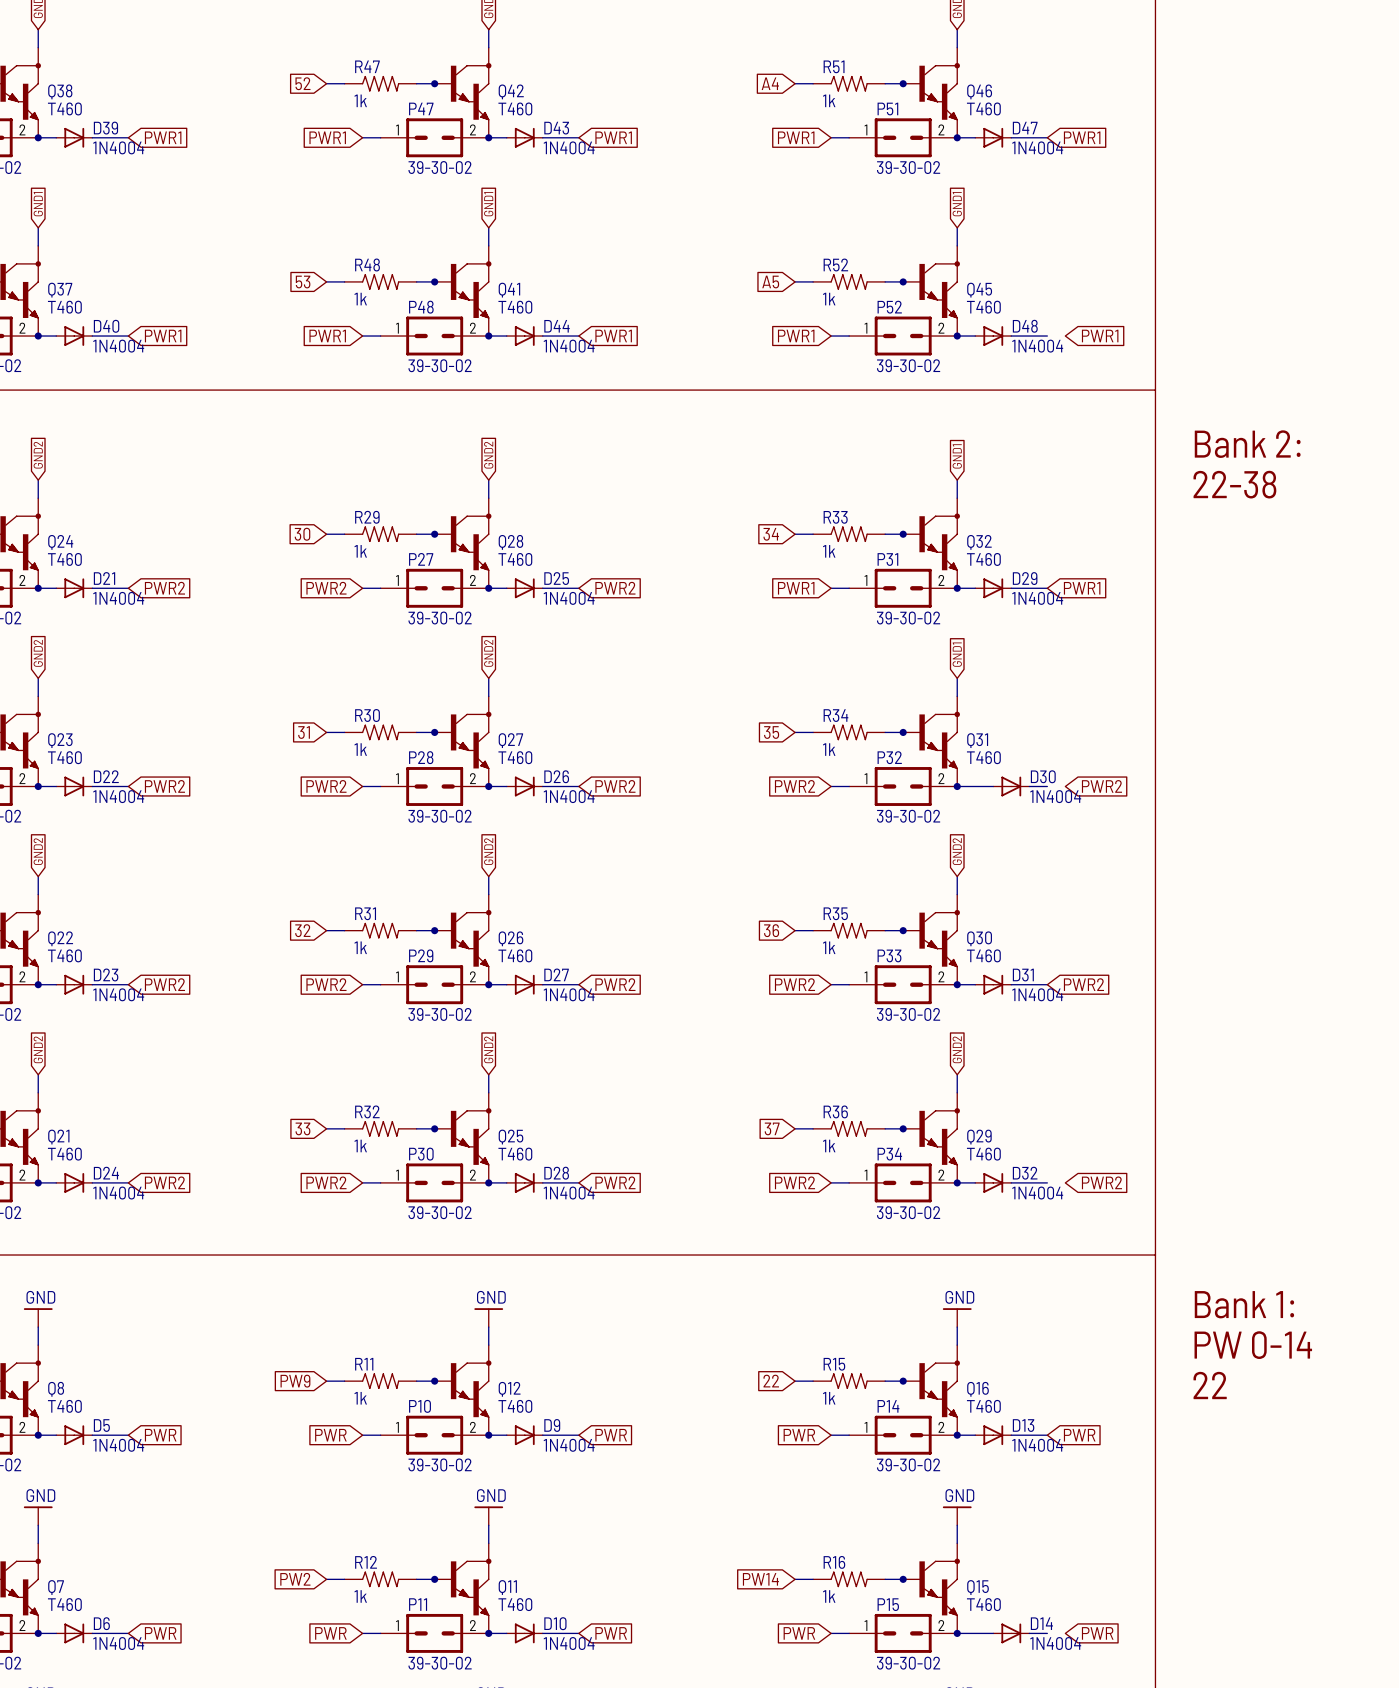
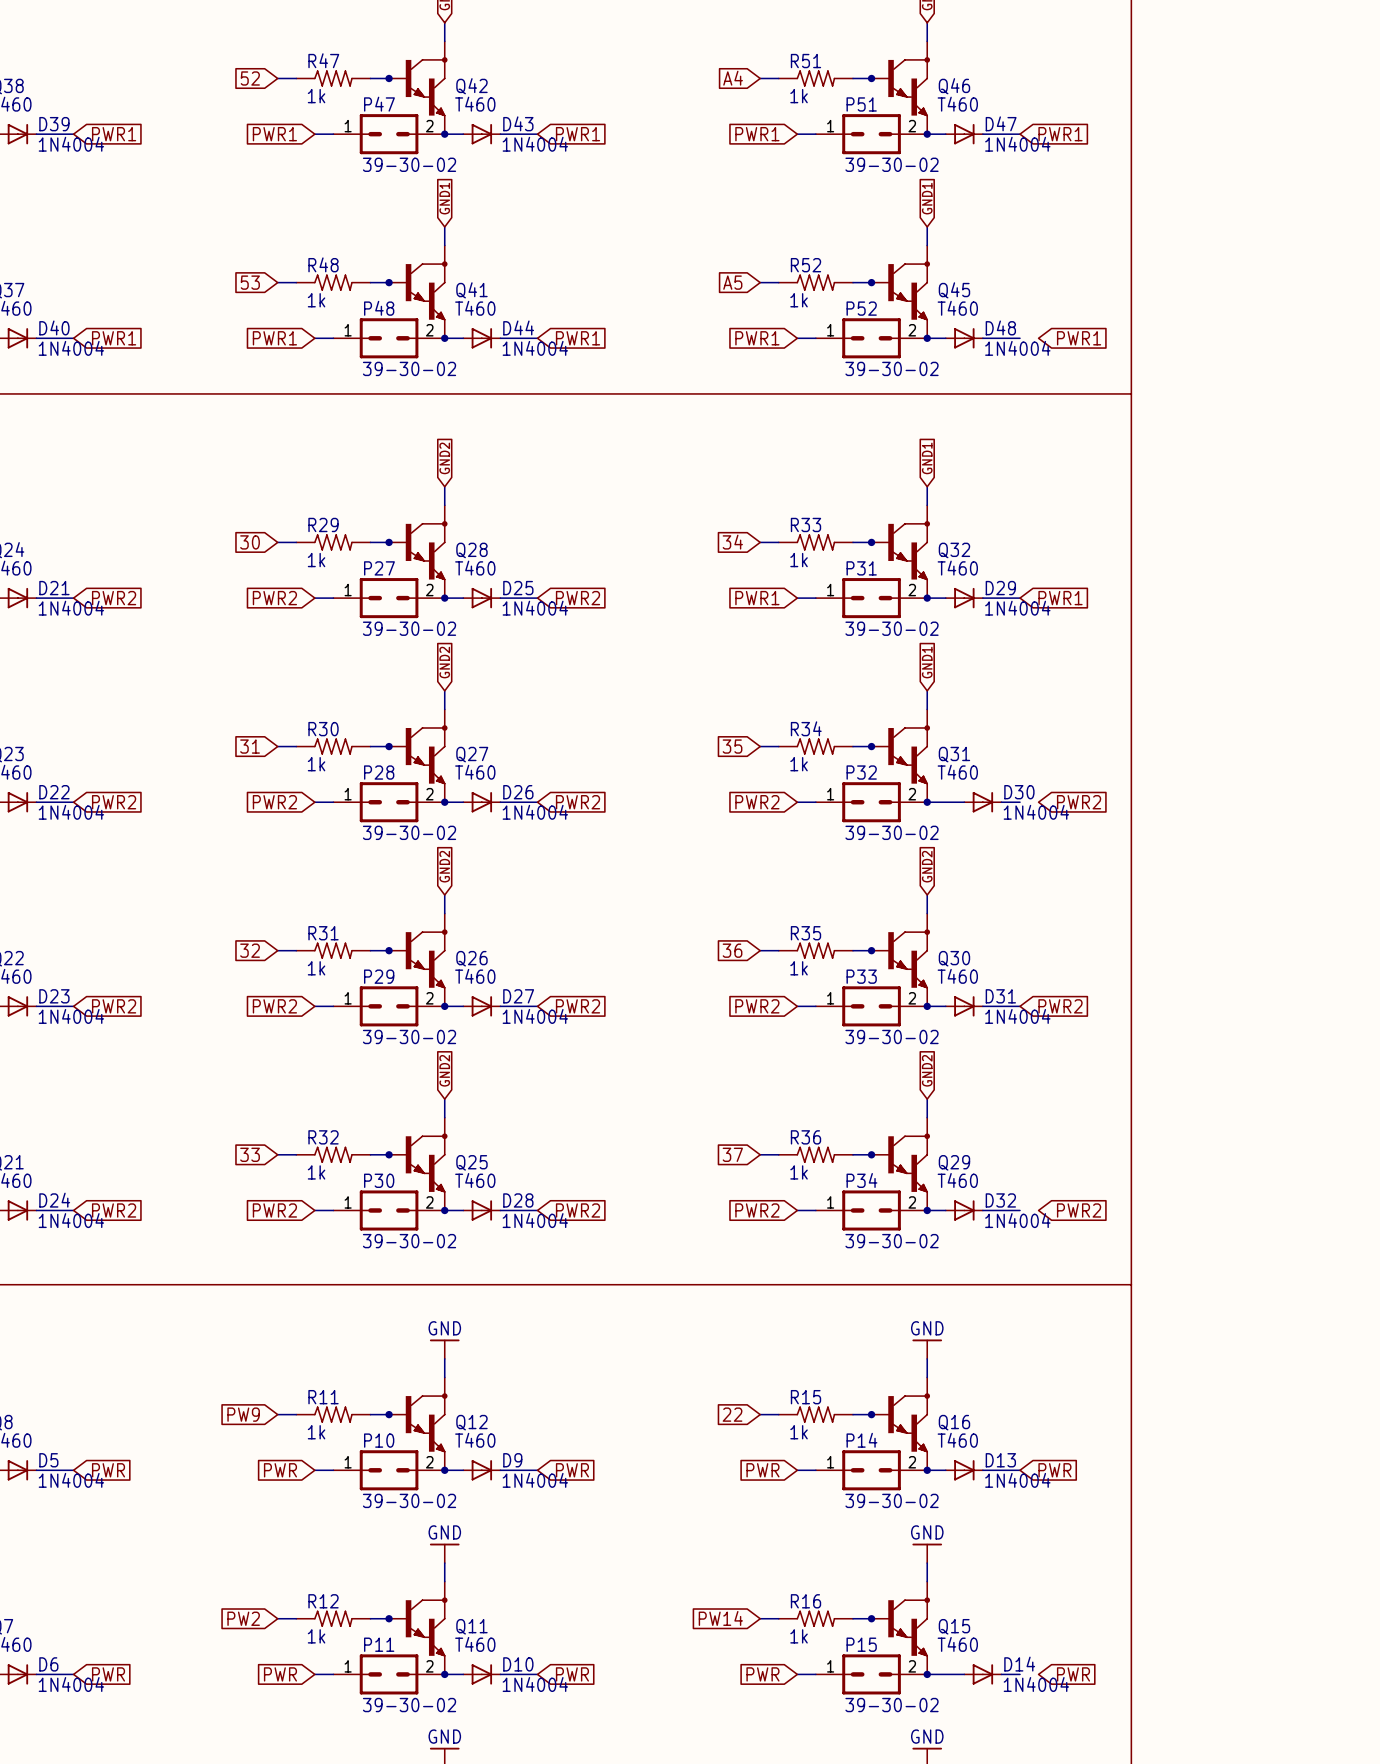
text: Bank 2: (1247, 444) -> none
text: 22-38 (1234, 484) -> none
text: Bank 1: (1244, 1304) -> none
text: PW 0-14 (1253, 1345) -> none
text: 22 (1210, 1385) -> none

